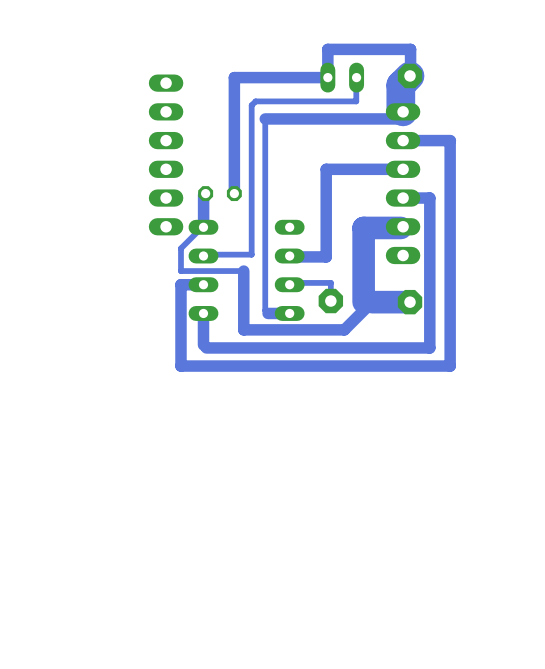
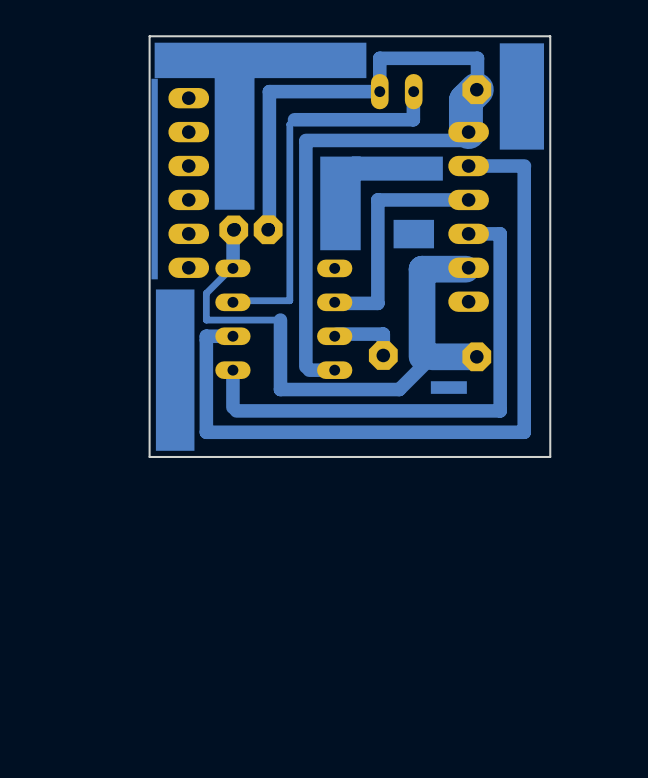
board edge: none -> (550, 36) (149, 36) (149, 456) (550, 456) (550, 36)
drawing: none -> [151, 42, 367, 451]
drawing: none -> [499, 43, 545, 150]
track width: thin (356, 78) (356, 101) (255, 101) -> thick (413, 93) (413, 119) (294, 119)
track width: thin (265, 120) (265, 310) -> thick (305, 141) (305, 366)
drawing: none -> [320, 156, 443, 251]
drawing: none -> [393, 219, 435, 249]
part: none -> (233, 229)
part: none -> (268, 229)
track width: thin (291, 282) (330, 282) (330, 301) -> thick (336, 334) (383, 334) (383, 355)
drawing: none -> [430, 381, 467, 394]

